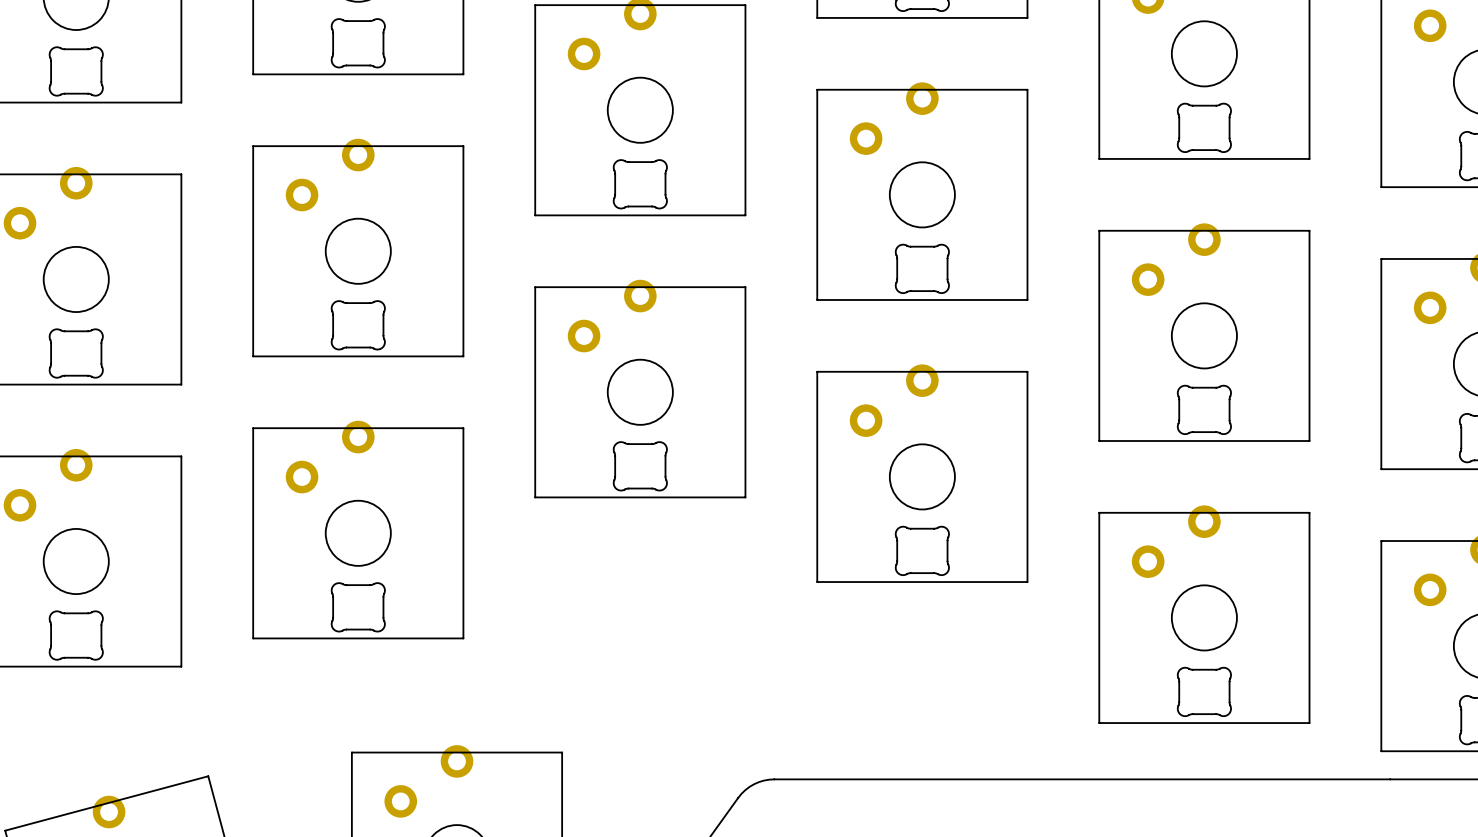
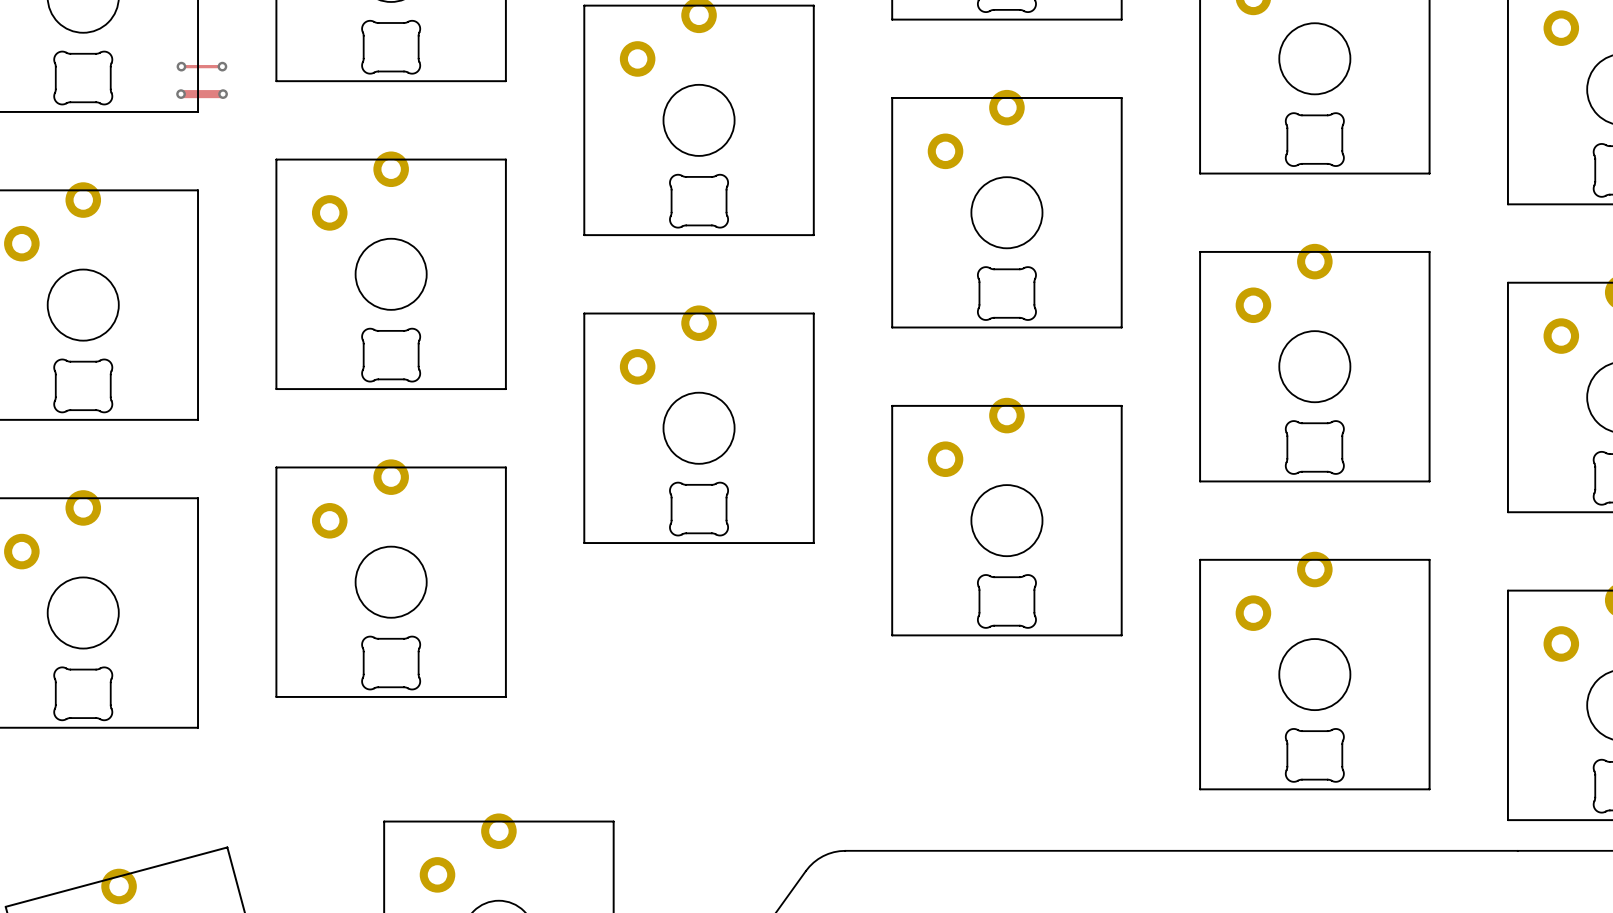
track: none -> (181, 66) (222, 66)
via: none -> (181, 66)
via: none -> (222, 66)
track: none -> (181, 94) (223, 94)
via: none -> (181, 94)
via: none -> (223, 94)

